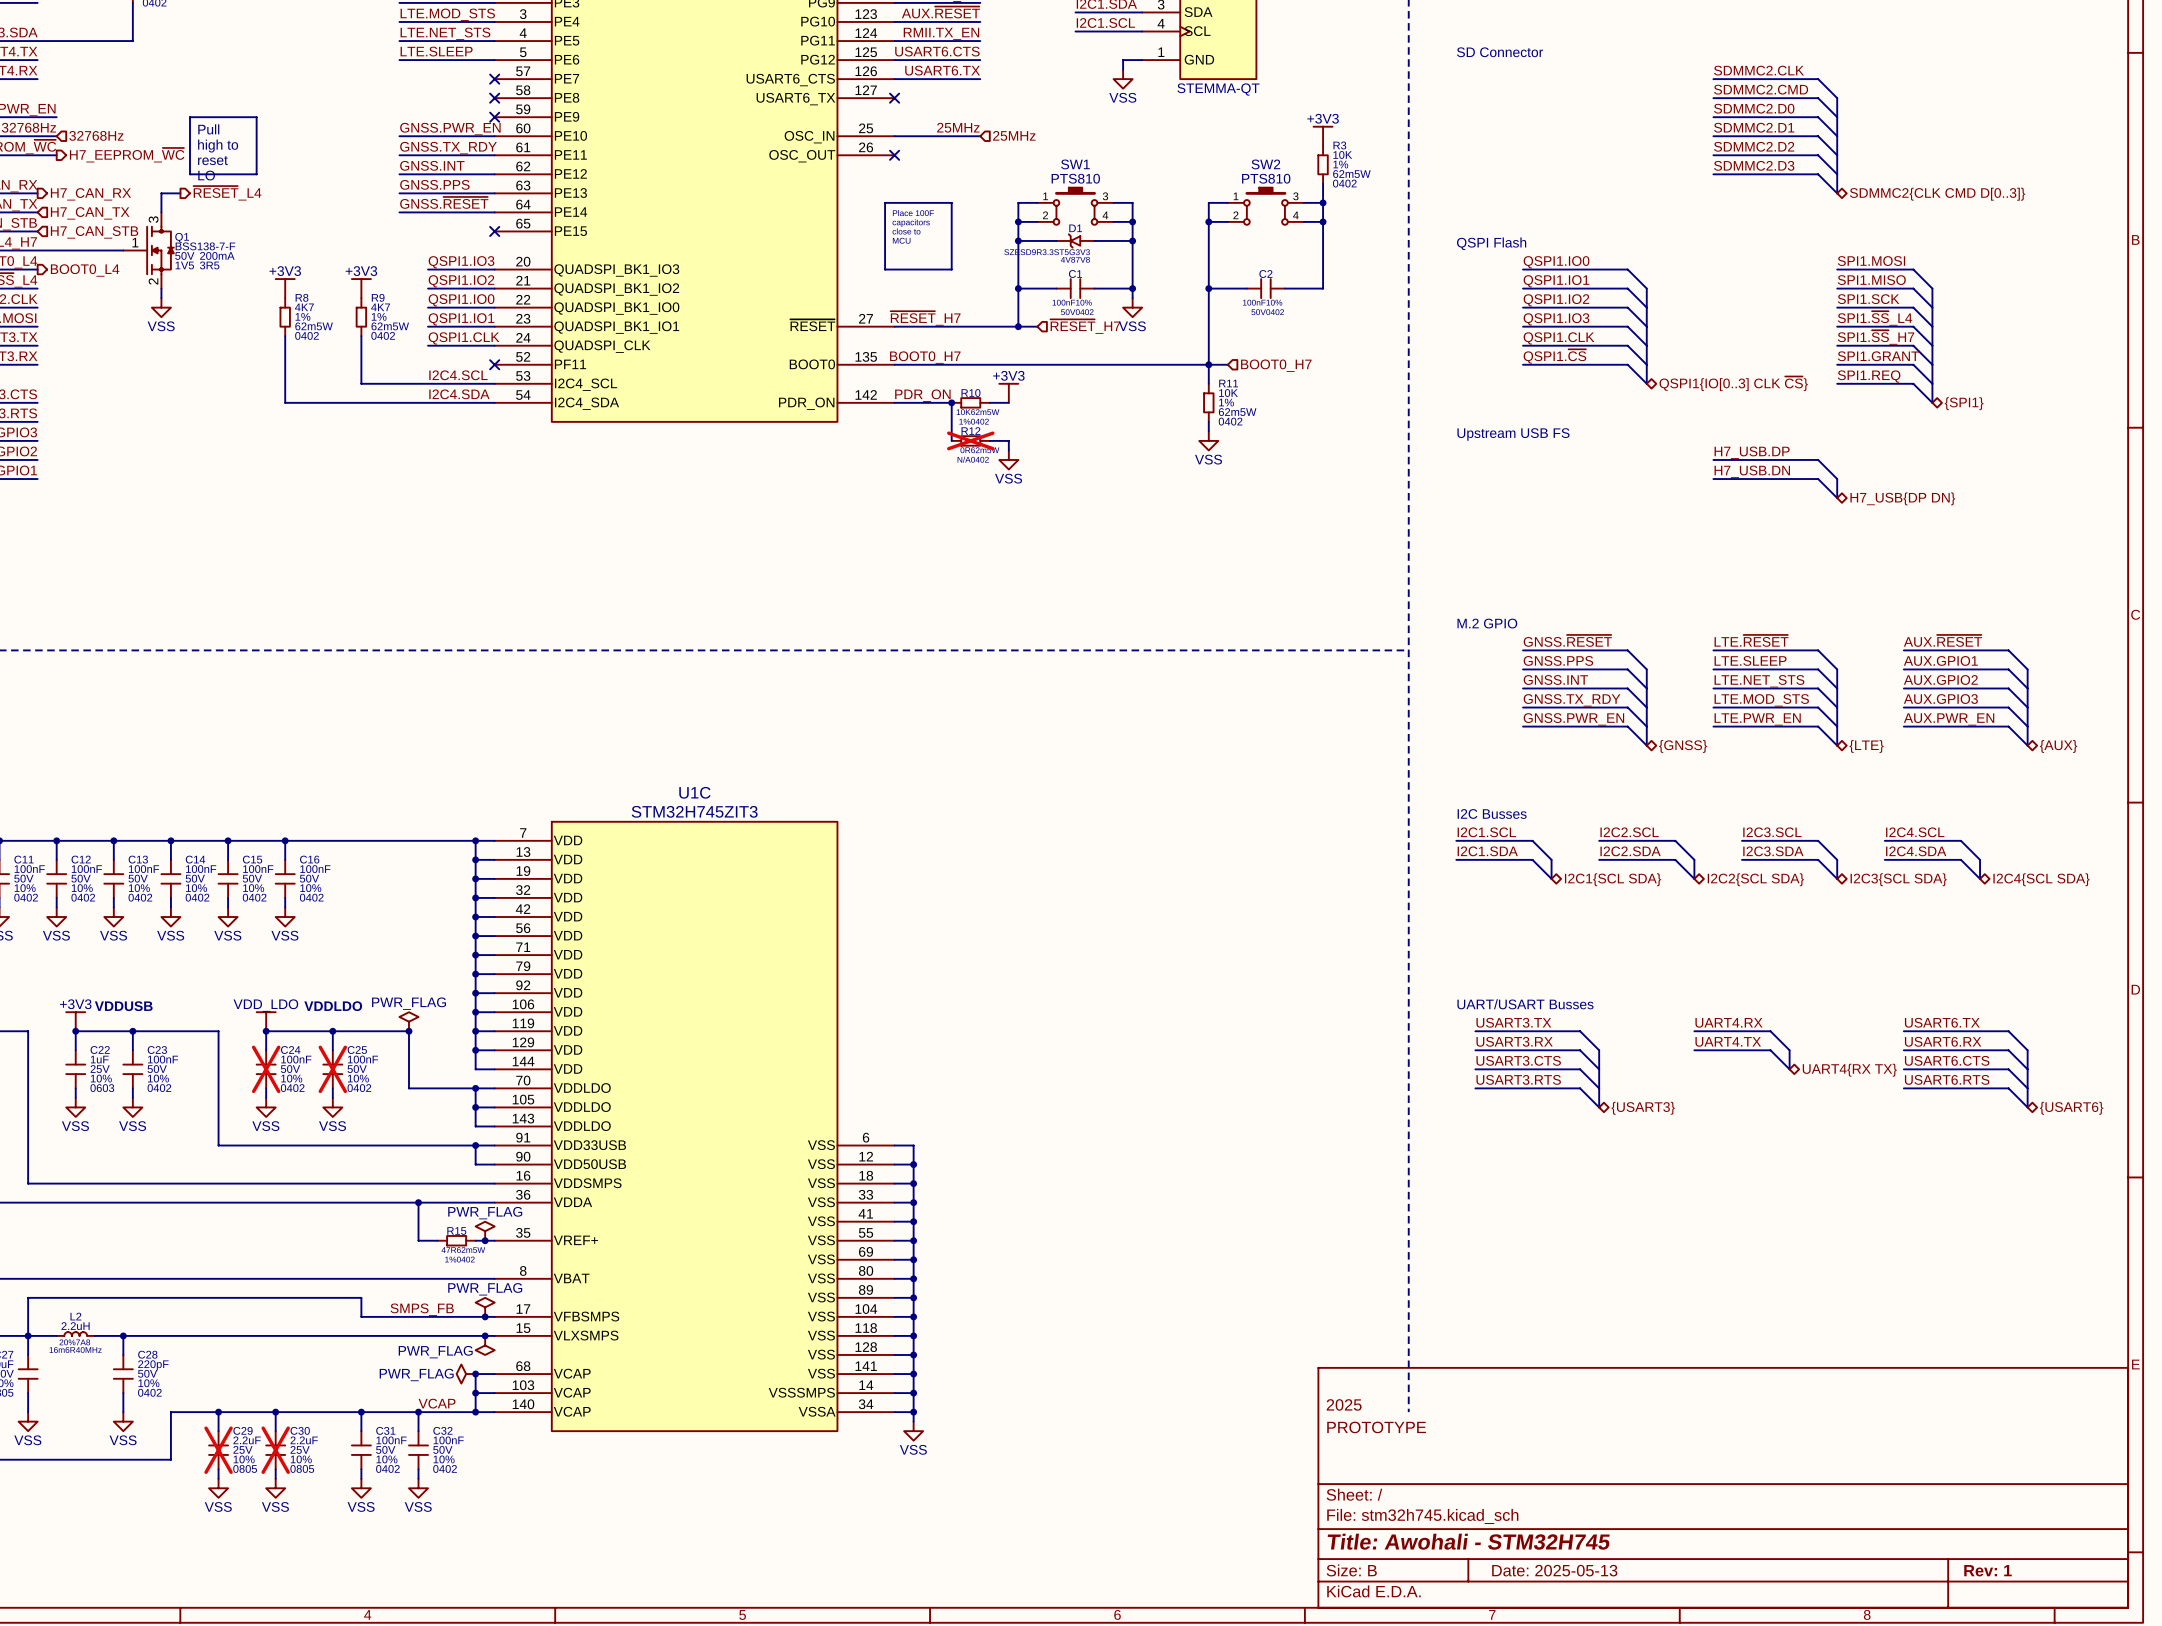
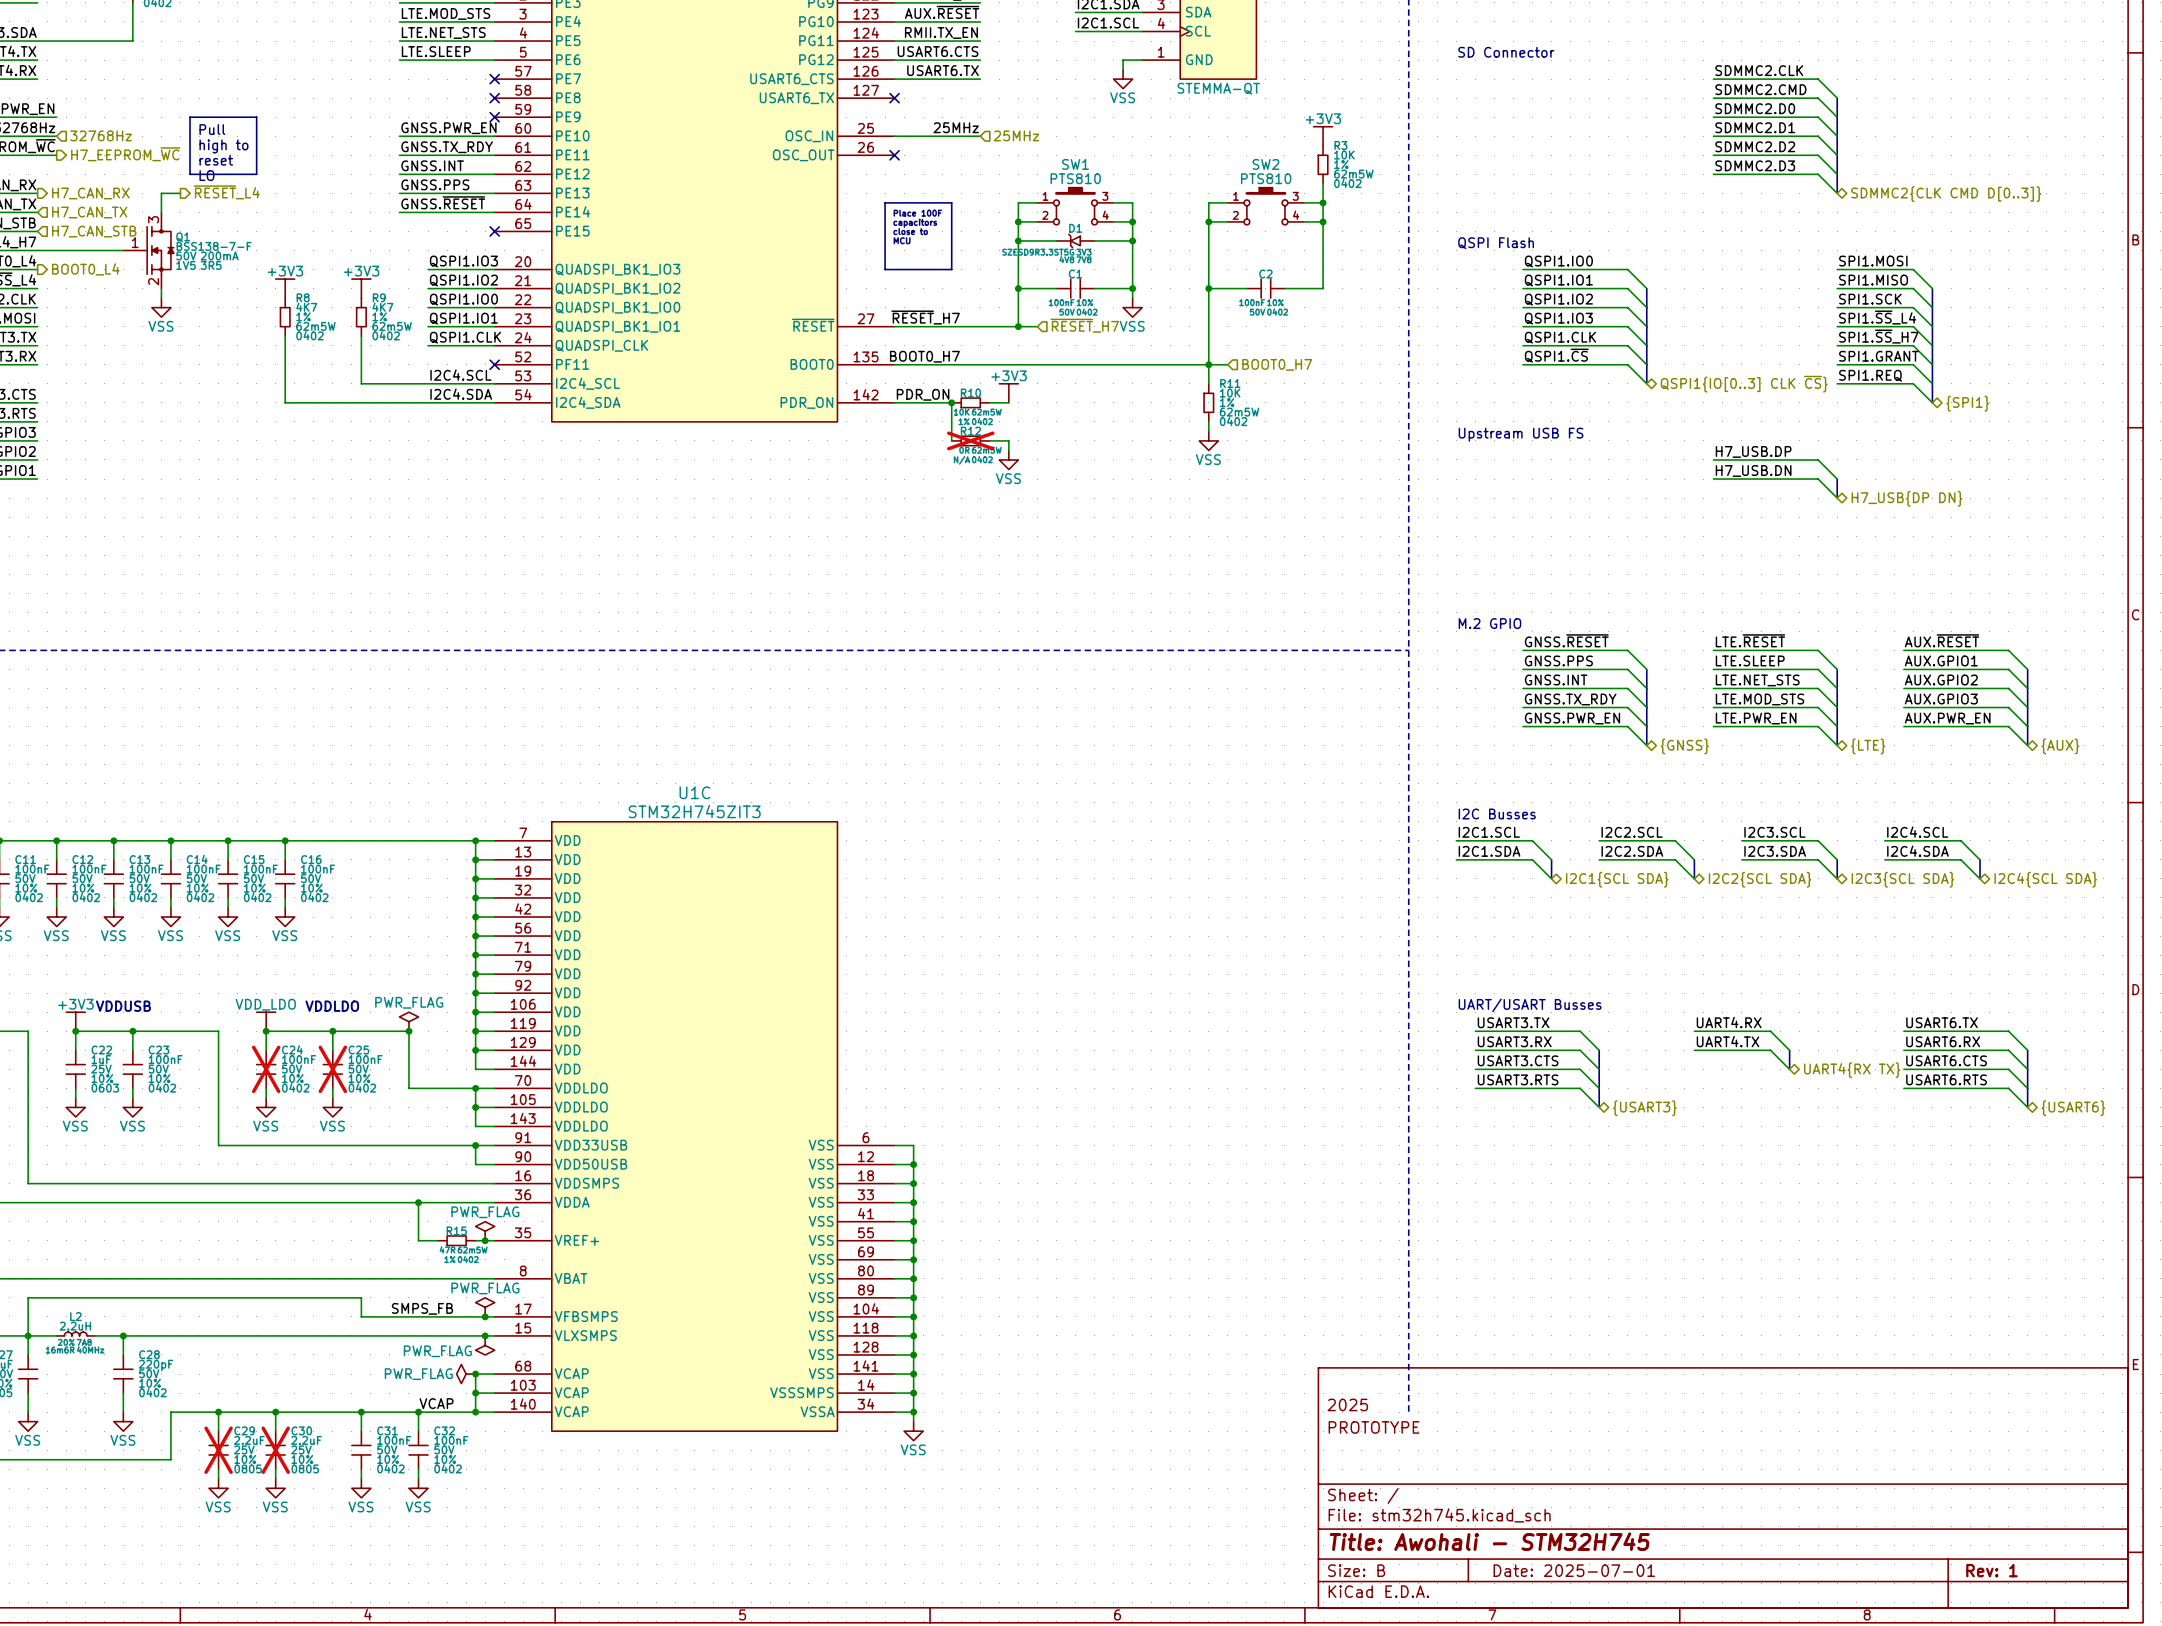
title block: Date: 2025-05-13 (1554, 1570) -> Date: 2025-07-01 (1574, 1570)

